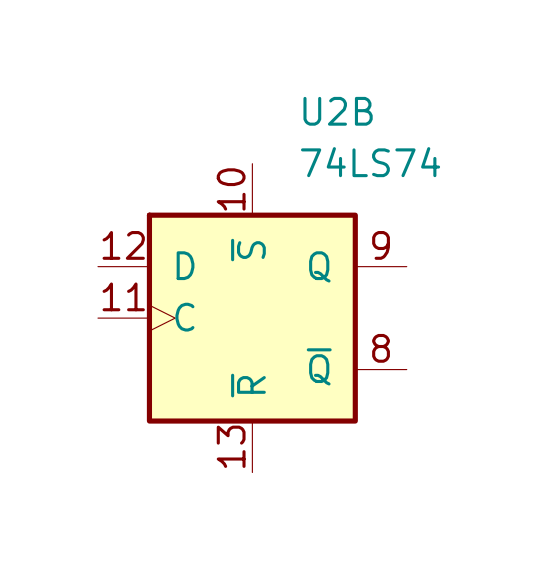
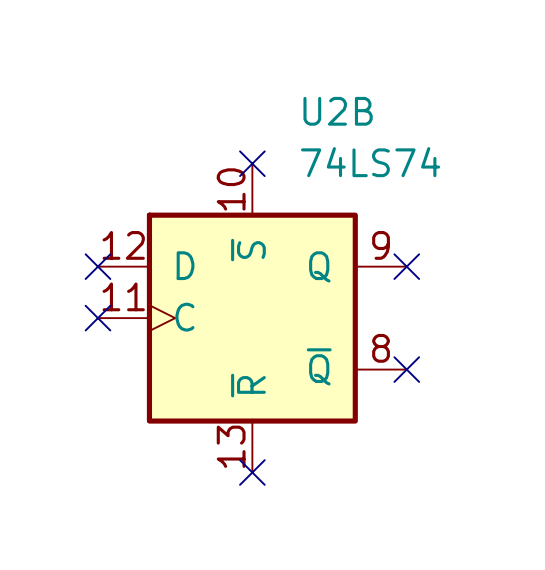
no-connect mark: none -> (252, 163)
no-connect mark: none -> (97, 266)
no-connect mark: none -> (406, 266)
no-connect mark: none -> (97, 318)
no-connect mark: none -> (406, 369)
no-connect mark: none -> (252, 472)

